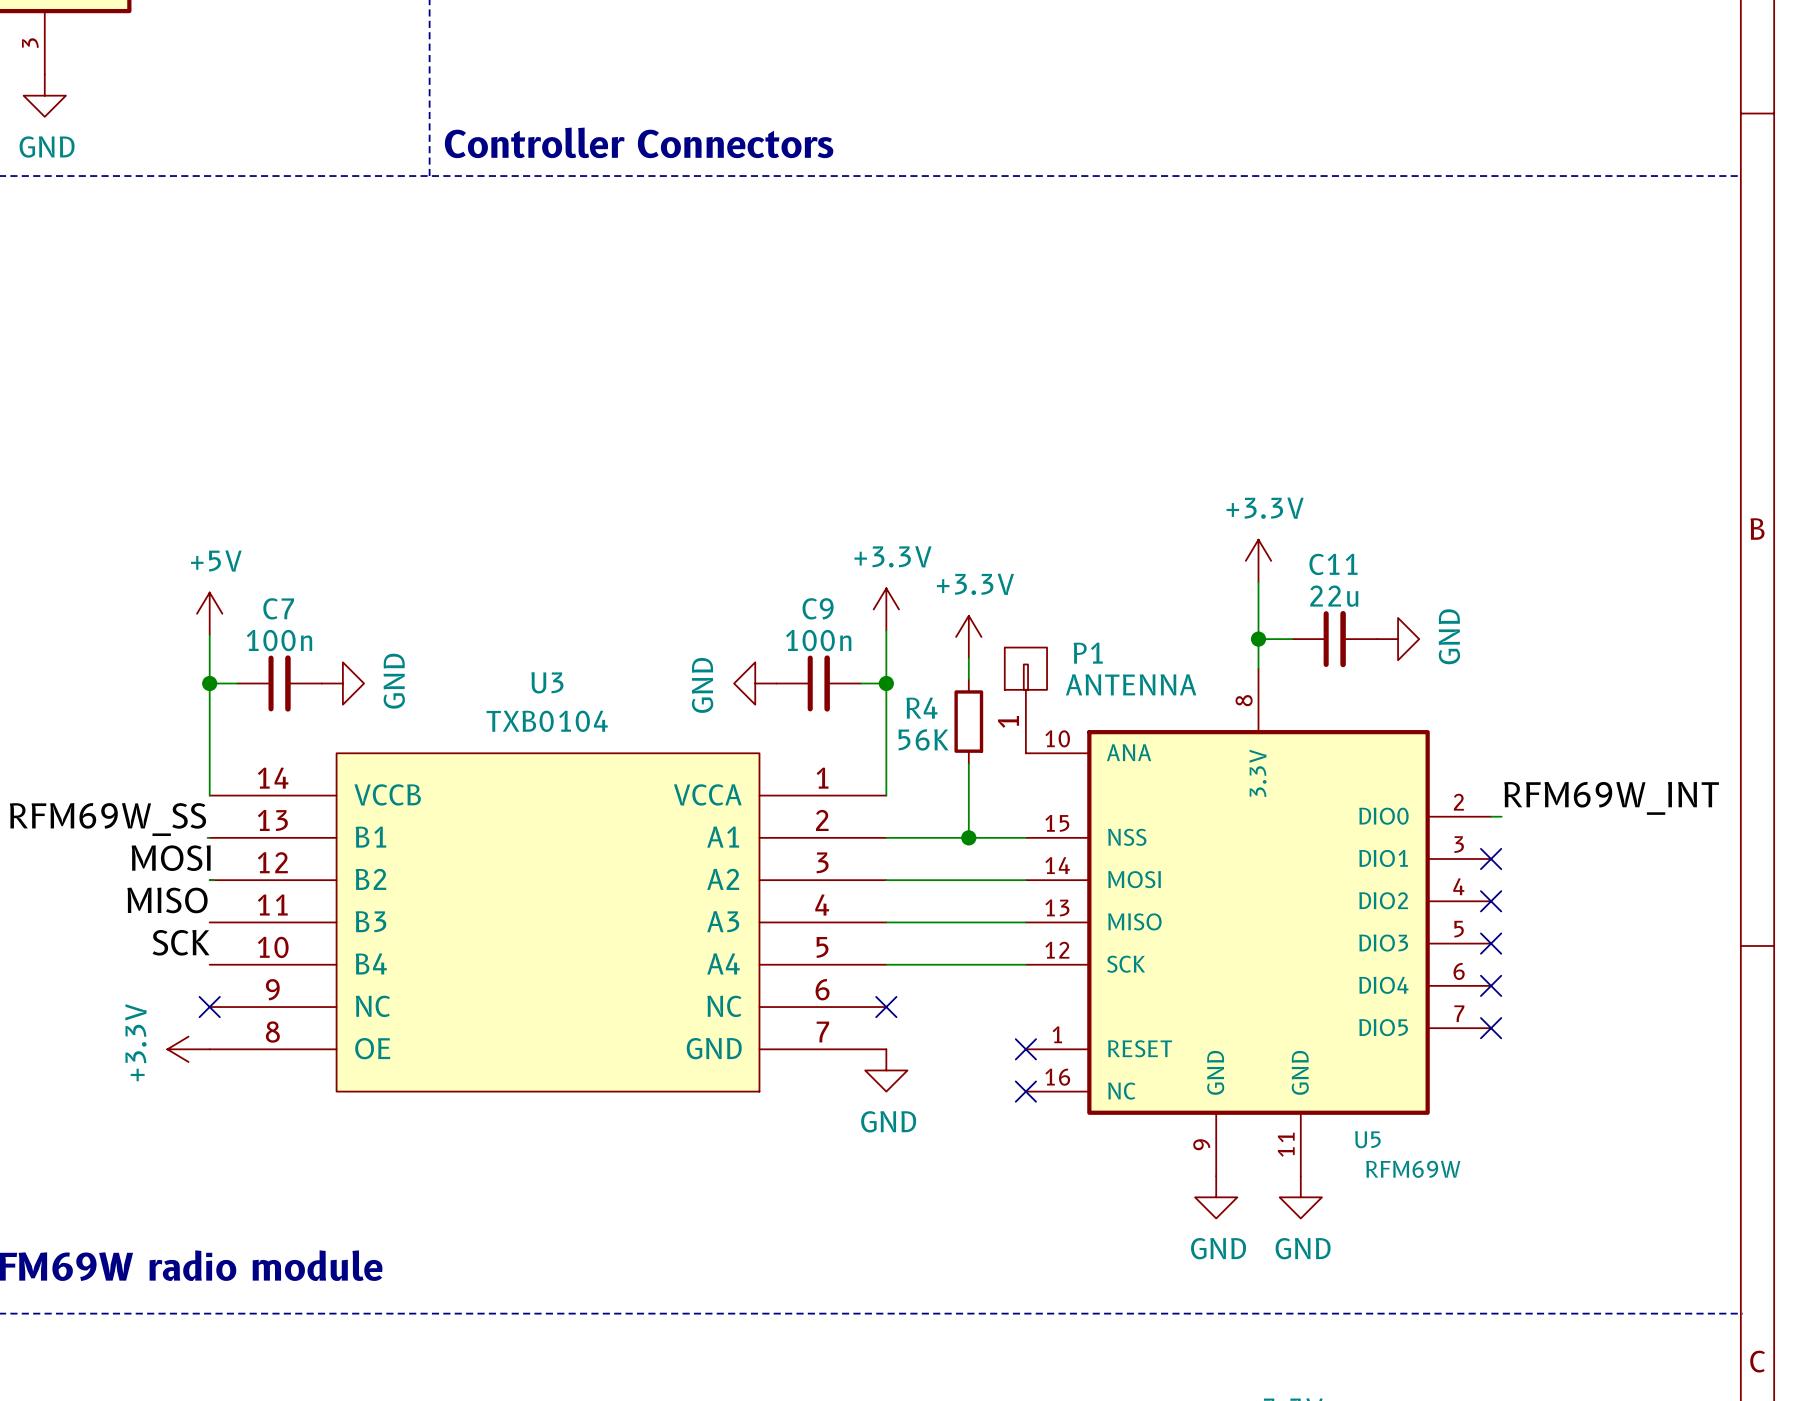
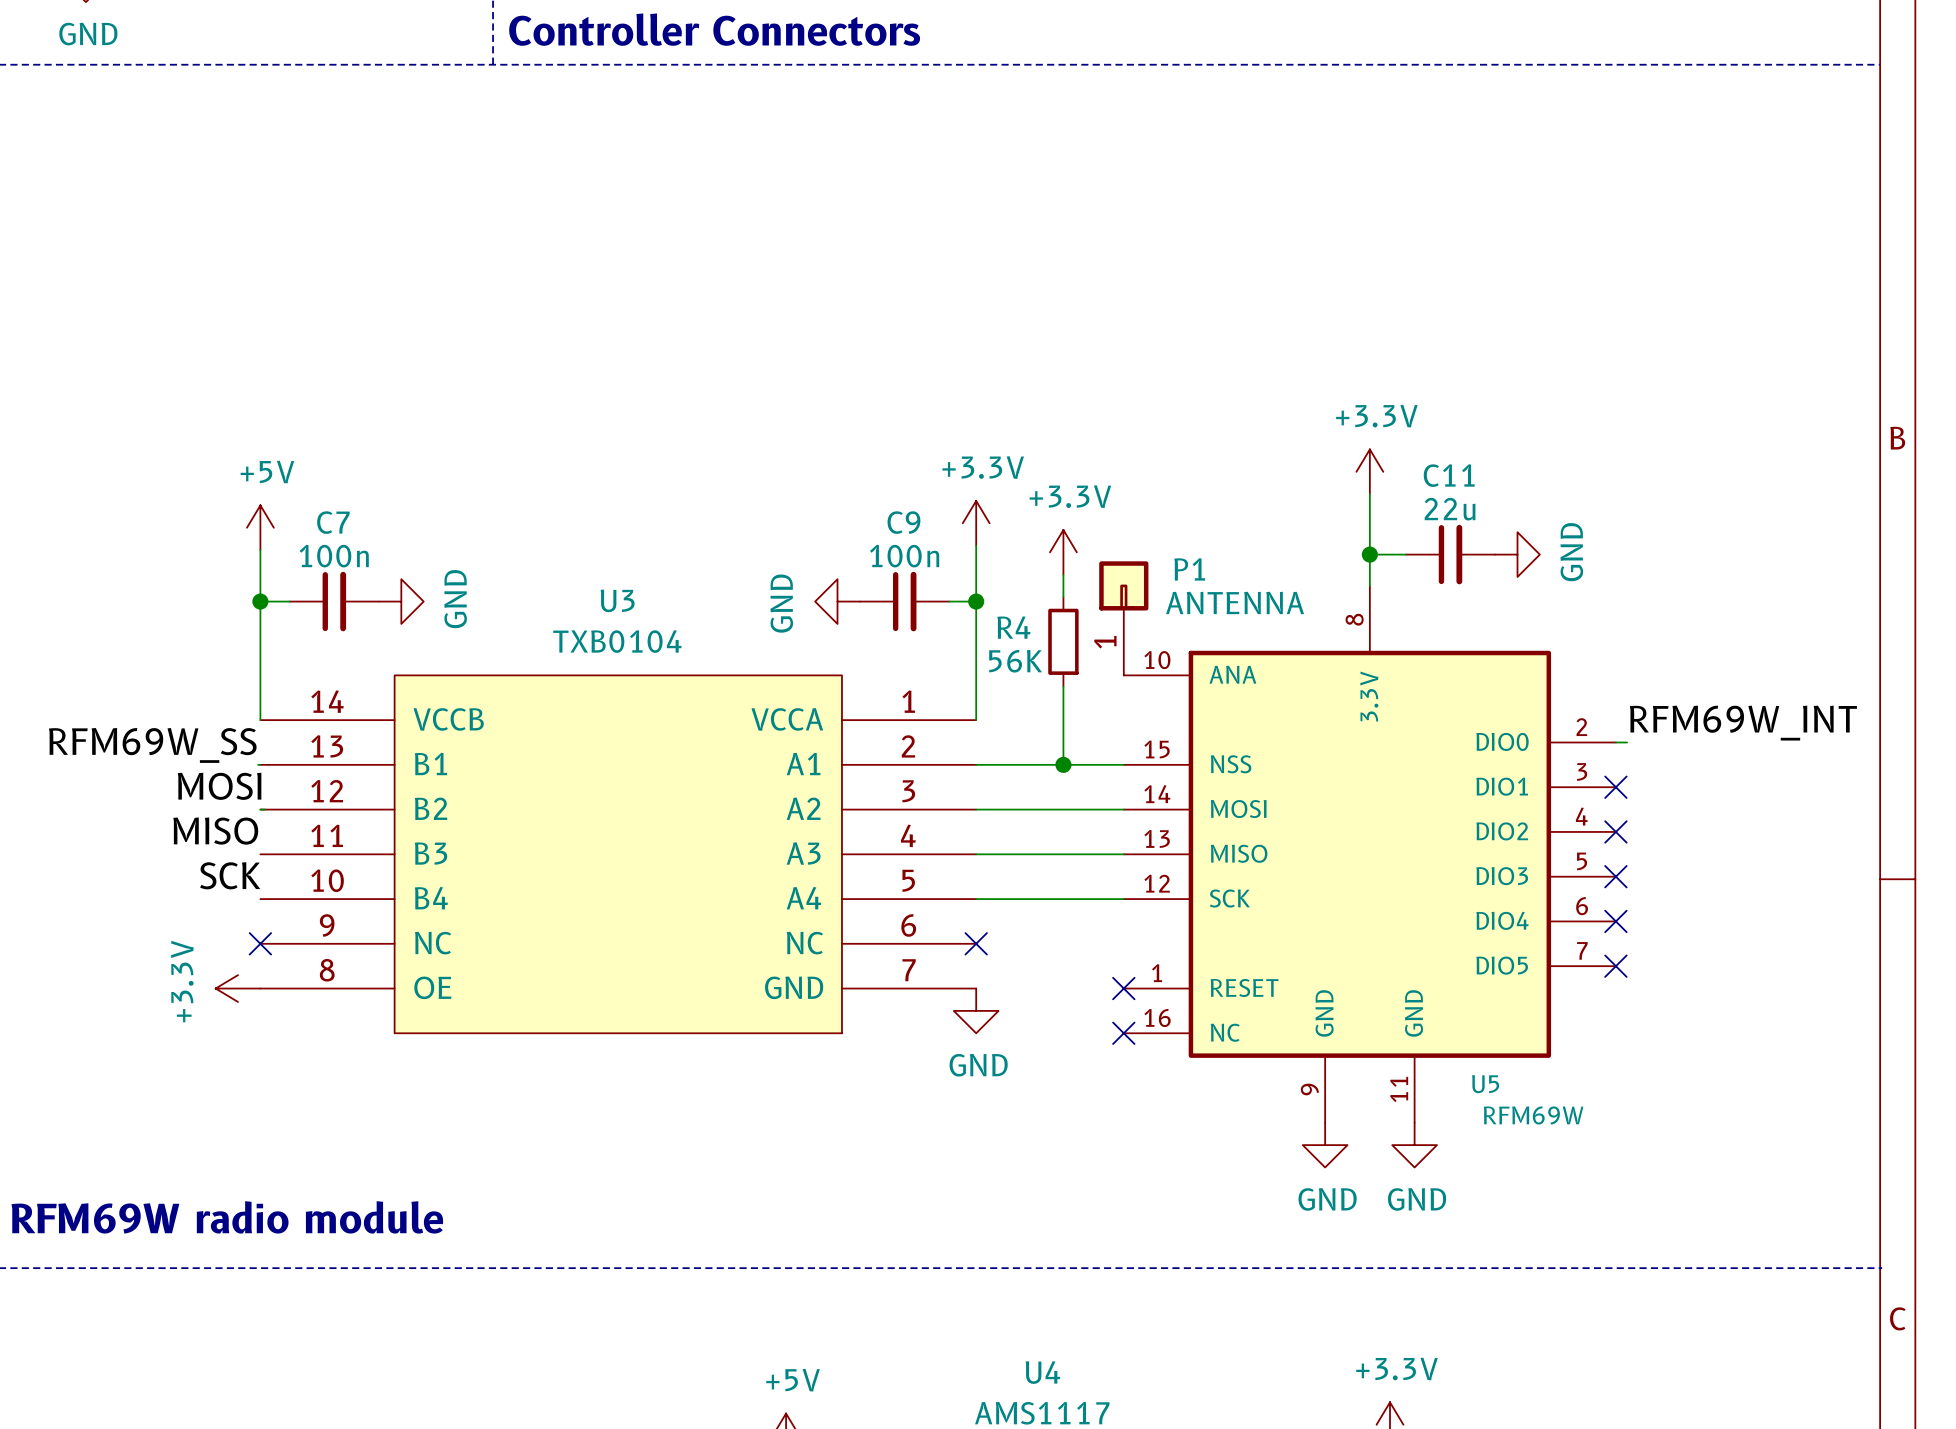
P1 symbol: [1004, 647, 1048, 754] -> [1099, 561, 1149, 676]

